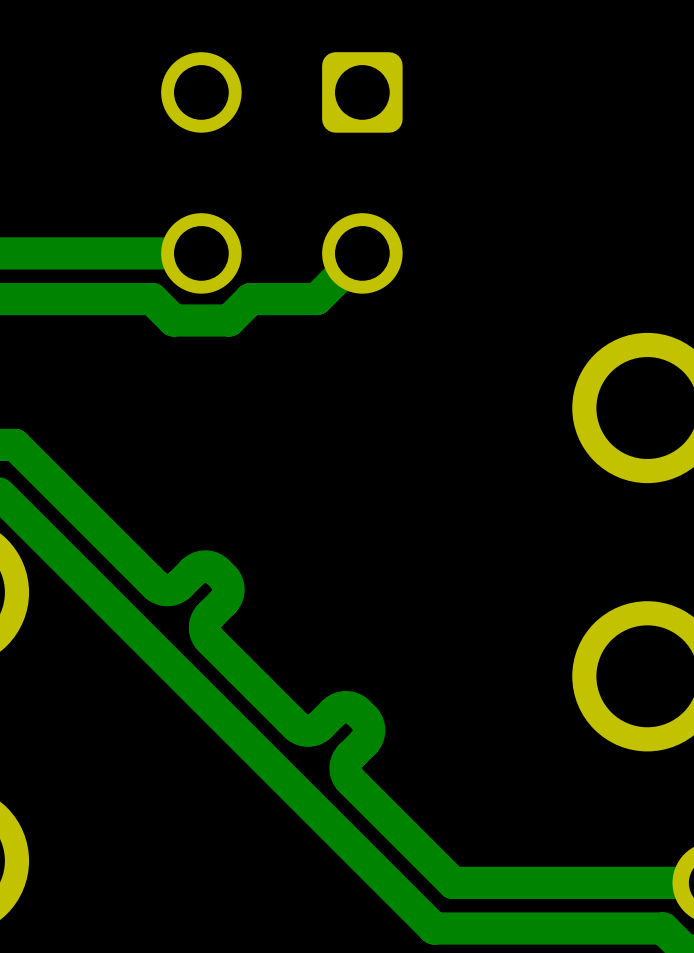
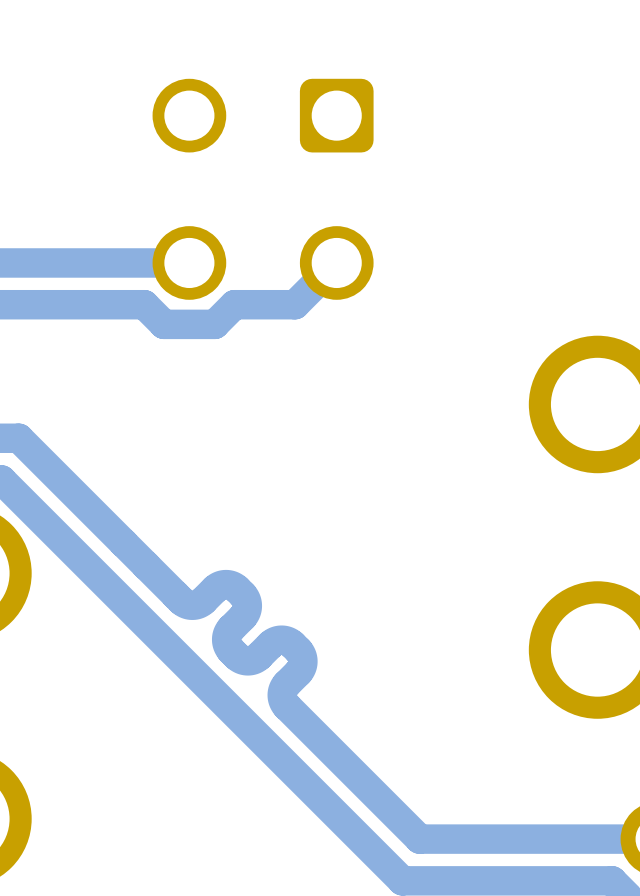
track: (155, 585) (163, 589) (173, 589) (194, 570) (203, 566) (212, 568) (223, 577) (228, 585) (227, 595) (207, 618) (205, 631) (209, 639) (247, 677) -> (147, 566) (181, 600) (188, 604) (200, 603) (216, 588) (222, 585) (232, 586) (242, 594) (247, 603) (246, 611) (230, 629) (227, 636) (227, 643) (231, 650)
track: (253, 683) (295, 725) (302, 729) (309, 730) (317, 728) (335, 710) (342, 707) (353, 708) (364, 718) (368, 726) (368, 735) (349, 757) (345, 764) (345, 772) (350, 780) -> (236, 656) (244, 660) (253, 659) (272, 643) (279, 640) (289, 642) (298, 650) (302, 657) (302, 666) (284, 686) (282, 693) (283, 700) (325, 745)

